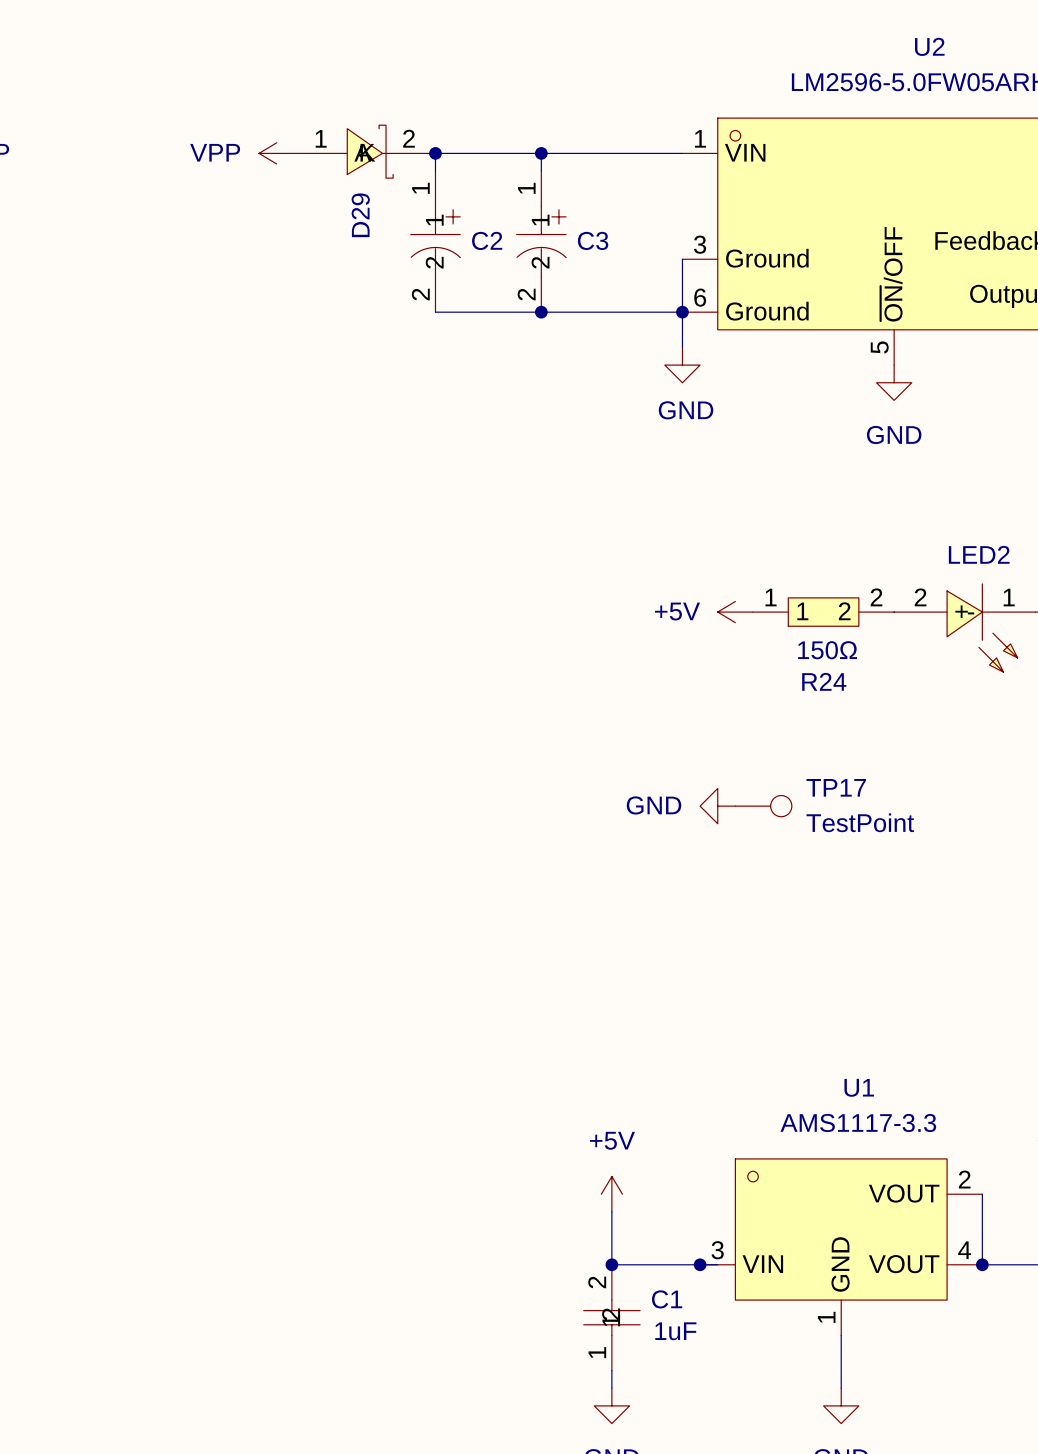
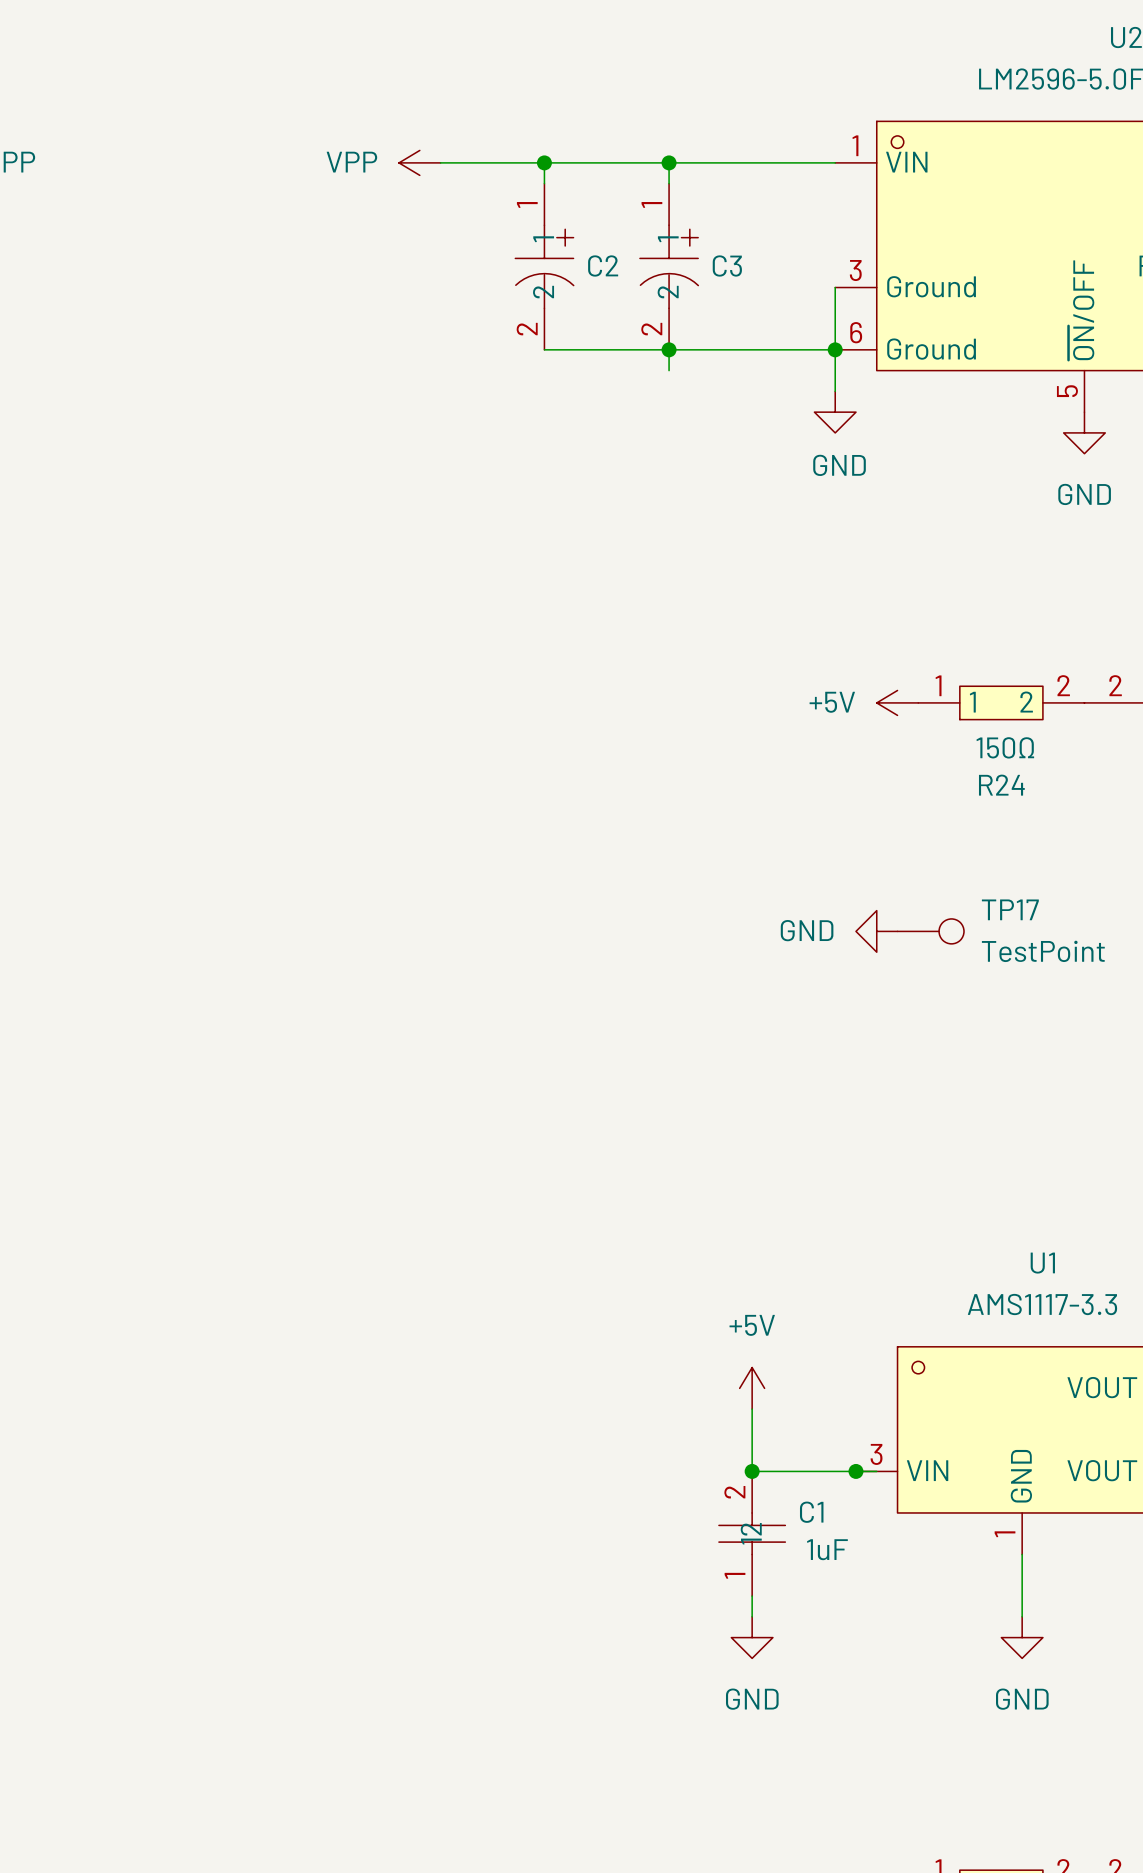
D29: (364, 151) -> none
power symbol position: VPP (276, 153) -> VPP (419, 162)
wire: none -> (669, 349) (669, 370)

